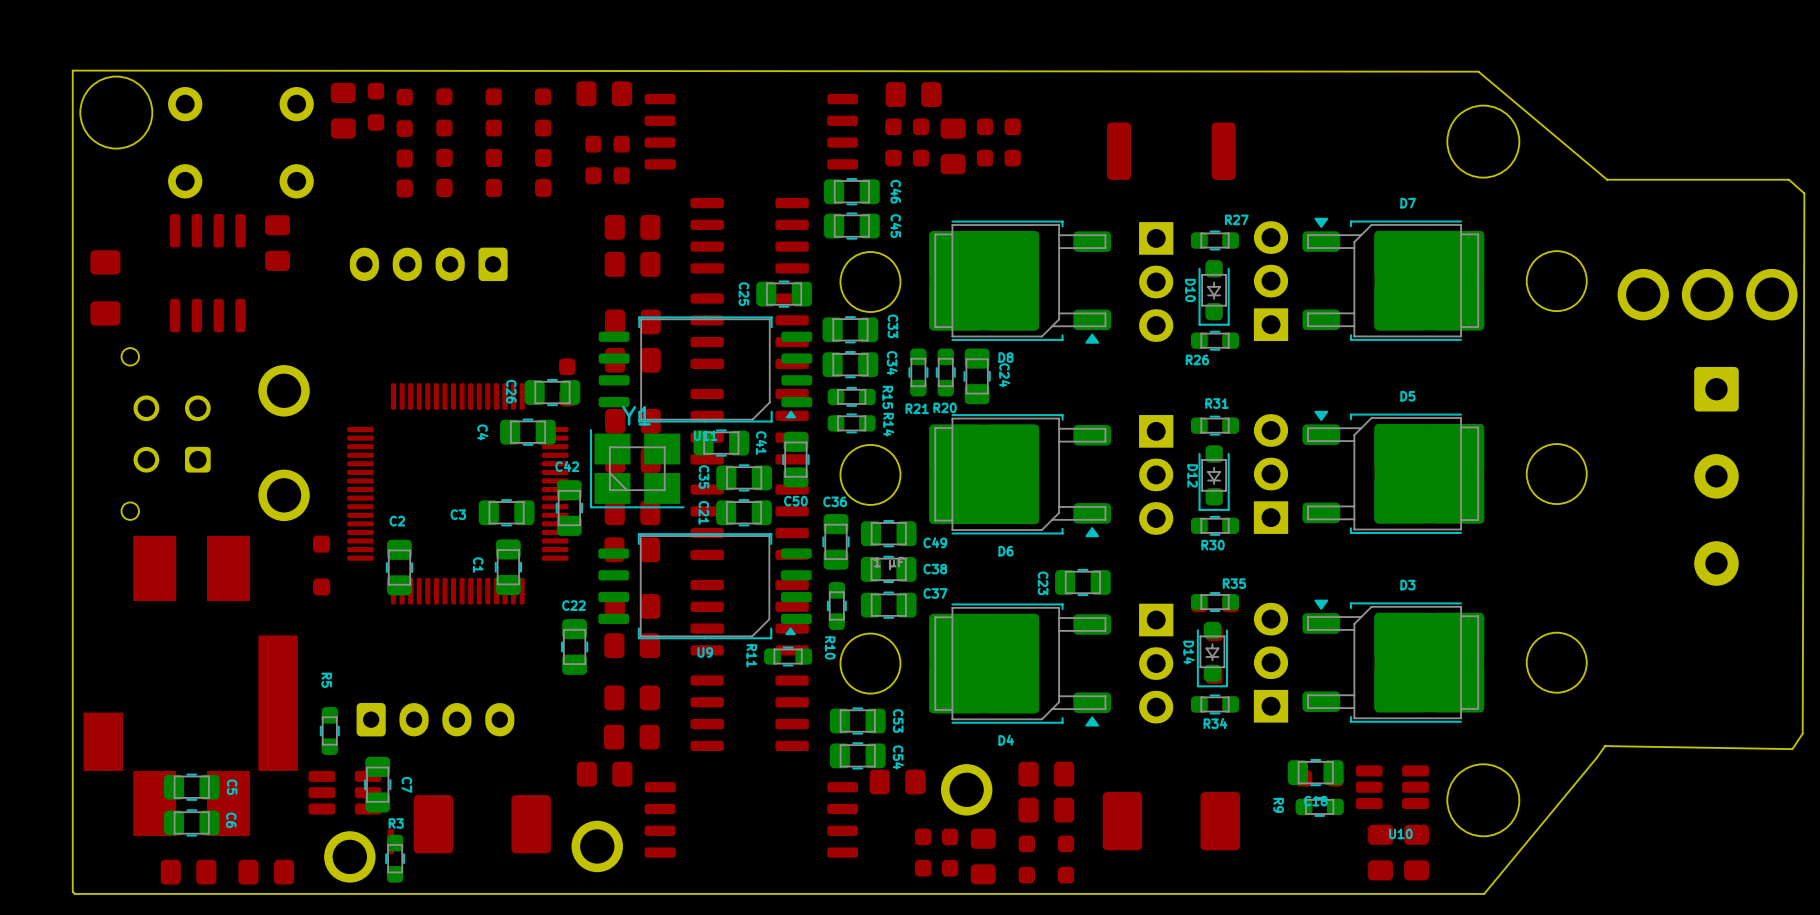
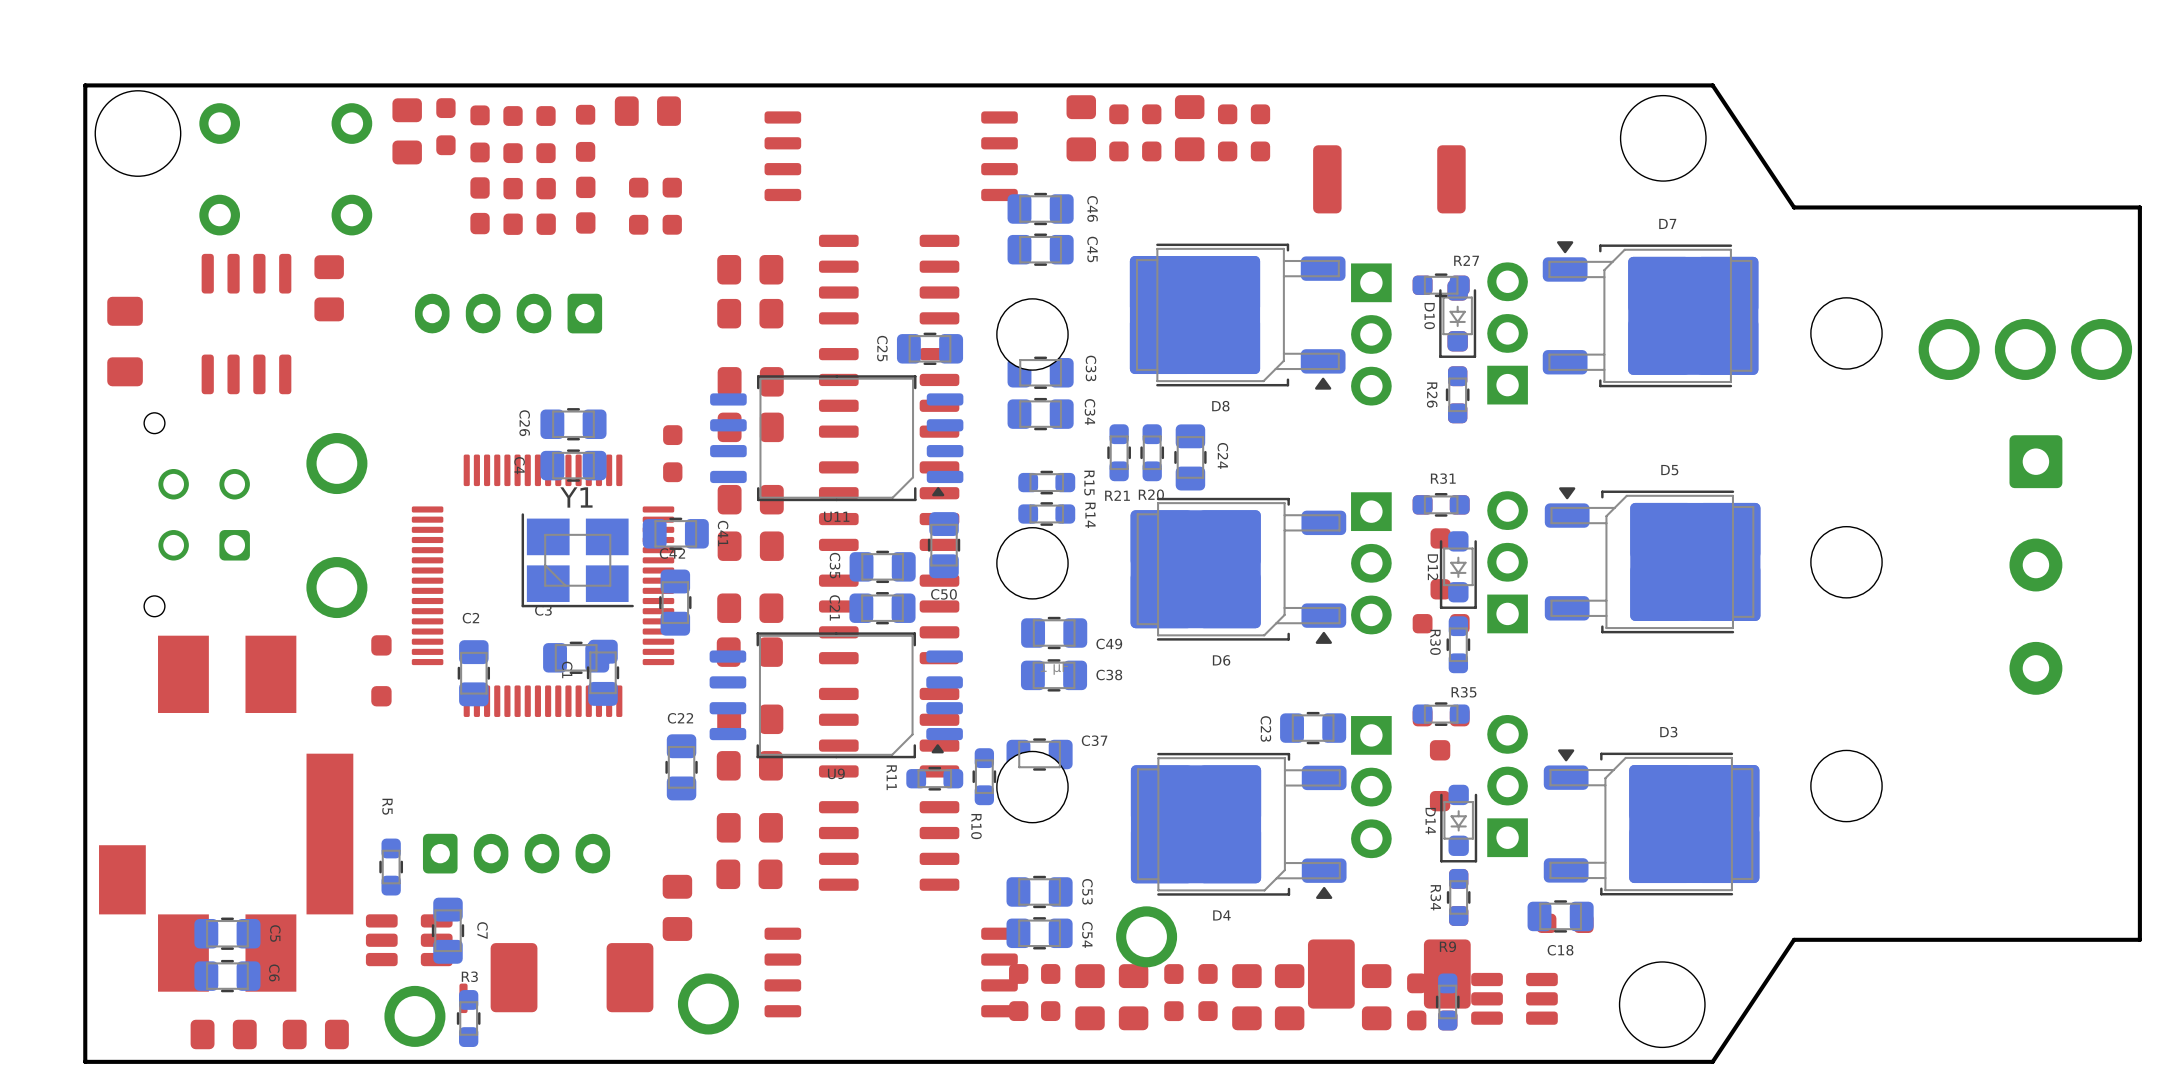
board edge: (72, 70) (1478, 71) (1607, 179) (1788, 179) (1804, 193) (1802, 733) (1792, 749) (1605, 745) (1484, 893) (74, 893) (72, 891) (72, 70) -> (1712, 85) (1794, 207) (2139, 207) (2139, 939) (1794, 939) (1712, 1061) (85, 1061) (85, 85) (1712, 85)
part position: (604, 93) -> (647, 111)
part rotation: 0° (913, 94) -> 90° clockwise (1081, 128)
part: (444, 112) -> none
part: (542, 112) -> none
part: none -> (1118, 132)
part: none -> (1151, 132)
part: none -> (1227, 132)
part: none -> (1260, 132)
part: none -> (513, 134)
part: none -> (545, 134)
round board edge position: (1483, 141) -> (1663, 138)
part: (893, 142) -> none
part: (921, 142) -> none
part: (984, 142) -> none
part: (1012, 142) -> none
part position: (952, 146) -> (1189, 128)
part footprint: [535, 148, 552, 197] -> [629, 177, 649, 235]
part: (593, 159) -> none
part: (621, 159) -> none
part: (444, 172) -> none
part: none -> (672, 206)
part: none -> (513, 206)
part: none -> (546, 206)
C46 position: (851, 191) -> (1040, 209)
C45 position: (851, 226) -> (1040, 249)
D7 position: (1393, 279) -> (1650, 314)
D8 position: (1020, 282) -> (1237, 316)
D10 position: (1214, 293) -> (1457, 319)
C33 position: (850, 329) -> (1040, 372)
R26 rotation: 0° (1215, 340) -> 90° clockwise (1457, 394)
C34 position: (850, 364) -> (1040, 414)
R21 position: (918, 372) -> (1119, 452)
R20 position: (945, 372) -> (1152, 452)
C24 position: (977, 376) -> (1190, 457)
C26 position: (552, 392) -> (573, 424)
R15 position: (851, 396) -> (1046, 482)
R14 position: (851, 423) -> (1046, 514)
C4 position: (527, 432) -> (573, 465)
C41 position: (721, 443) -> (675, 533)
Y1 position: (637, 468) -> (577, 560)
D6 position: (1020, 475) -> (1238, 570)
D12 position: (1214, 478) -> (1458, 570)
C3 position: (506, 512) -> (576, 657)
R30 rotation: 0° (1215, 525) -> 90° clockwise (1458, 644)
C36: (835, 541) -> none
C23 position: (1082, 582) -> (1313, 728)
R10 position: (836, 605) -> (984, 776)
C37 position: (888, 605) -> (1039, 754)
D14 position: (1212, 654) -> (1458, 823)
D3 position: (1393, 661) -> (1651, 822)
D4 position: (1020, 664) -> (1238, 825)
R34 rotation: 0° (1215, 704) -> 90° clockwise (1458, 897)
R34 position: (1215, 704) -> (1458, 897)
C53 position: (857, 721) -> (1039, 891)
C54 position: (857, 755) -> (1039, 933)
part rotation: 0° (604, 774) -> 90° clockwise (677, 907)
part position: (604, 774) -> (677, 907)
part: (1046, 774) -> none
part: (897, 781) -> none
U10: (1392, 787) -> none
round board edge position: (1483, 800) -> (1662, 1004)
R9 rotation: 0° (1319, 806) -> 90° clockwise (1447, 1001)
R9 position: (1319, 806) -> (1447, 1001)
part: (1046, 810) -> none
part footprint: [914, 828, 932, 877] -> [1075, 964, 1105, 1031]
part footprint: [941, 828, 959, 877] -> [1118, 964, 1149, 1031]
part: none -> (1018, 992)
part: none -> (1050, 992)
part: none -> (1173, 992)
part: none -> (1208, 992)
part: none -> (1246, 997)
part: none -> (1289, 997)
part: none -> (1376, 997)
part: none -> (1514, 998)
part: none -> (1416, 1001)
part: (1380, 852) -> none
part: (1416, 852) -> none
part: (983, 856) -> none
part: (1026, 859) -> none
part: (1066, 859) -> none

